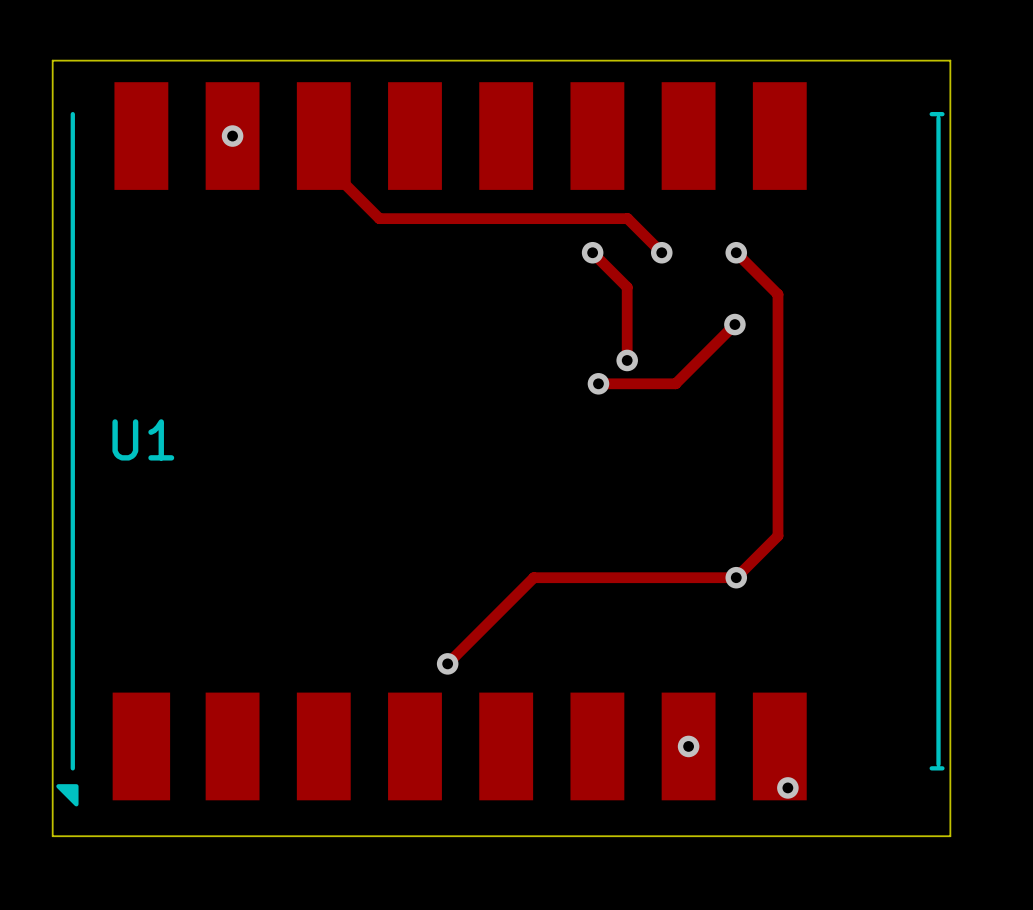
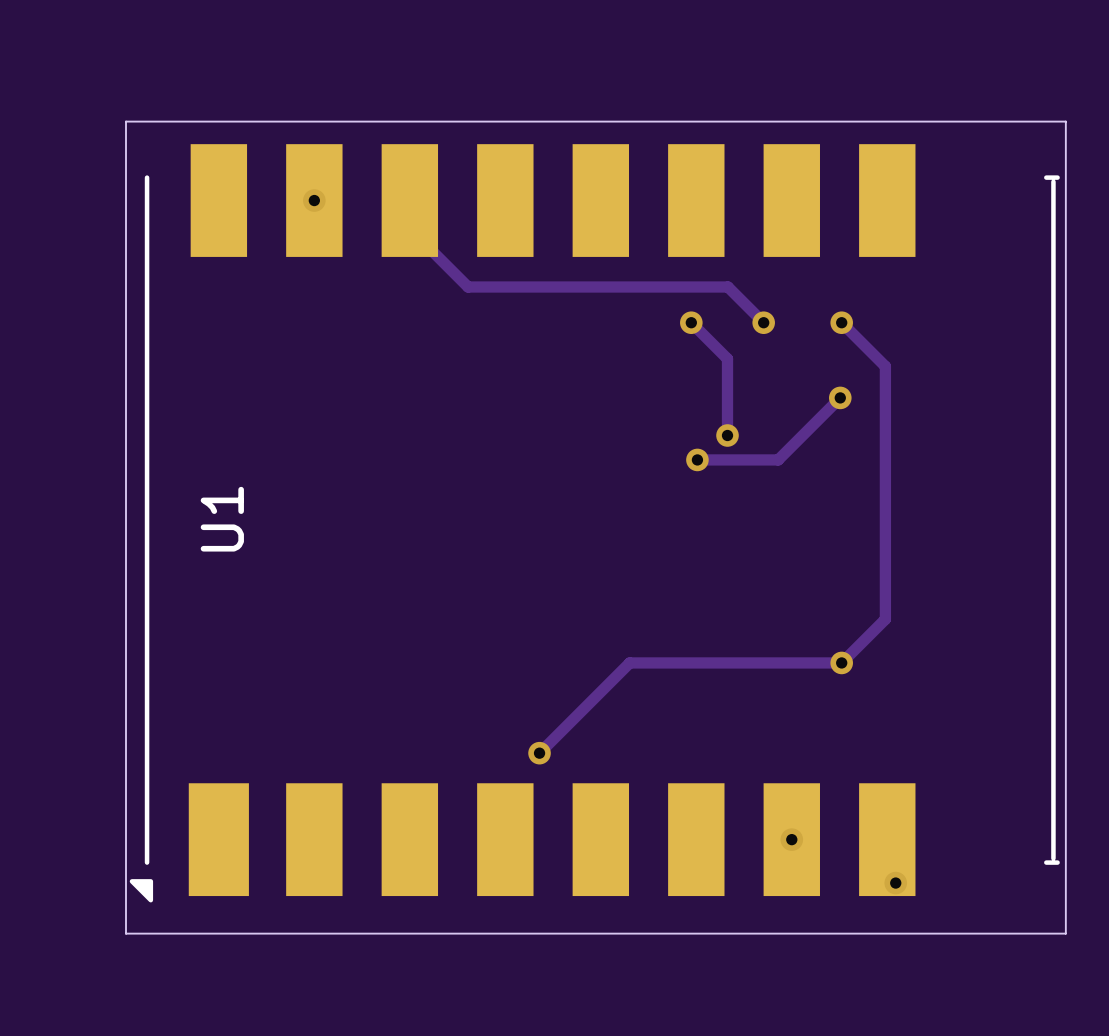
U1 name rotation: 0° (143, 439) -> 90° counterclockwise (222, 519)

